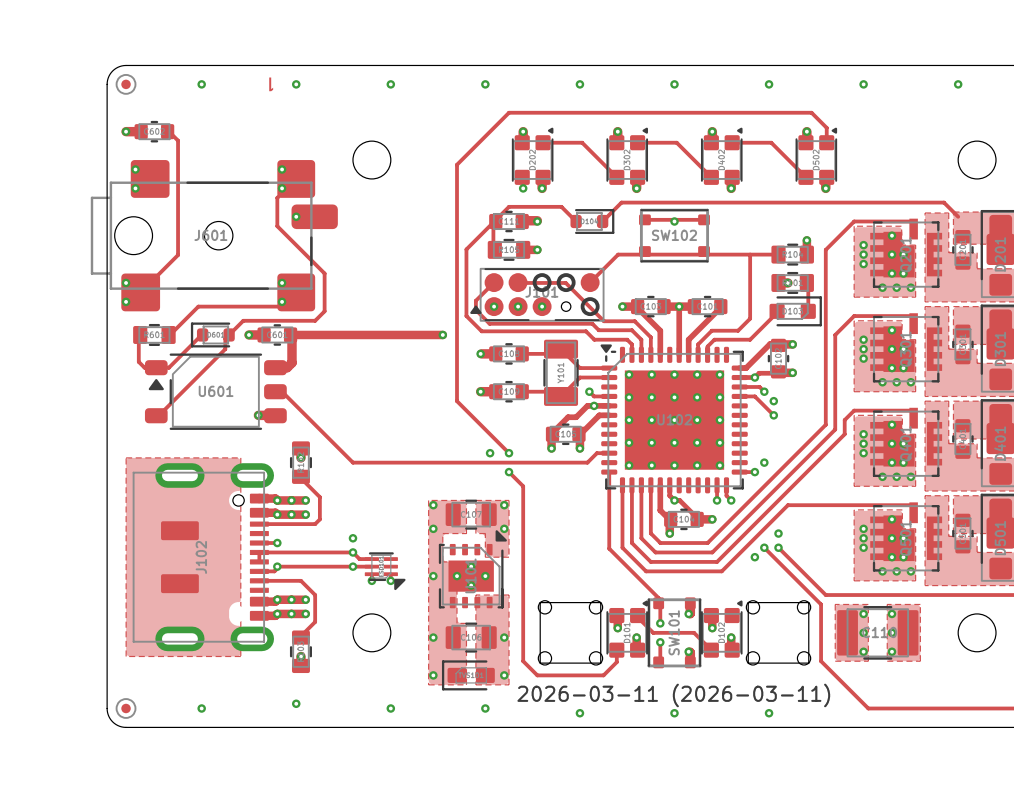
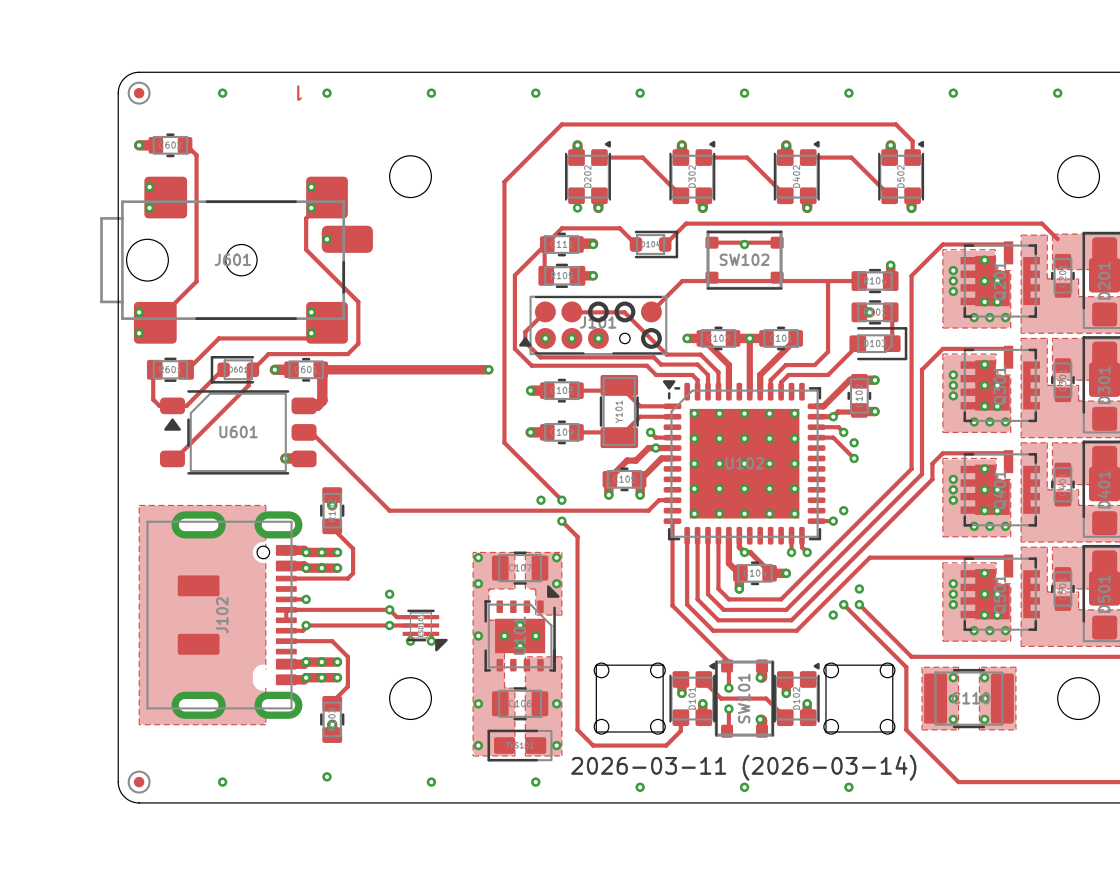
part footprint: [441, 660, 495, 691] -> [487, 729, 553, 762]
drawing shape: [517, 683, 831, 708] -> [571, 754, 917, 781]

